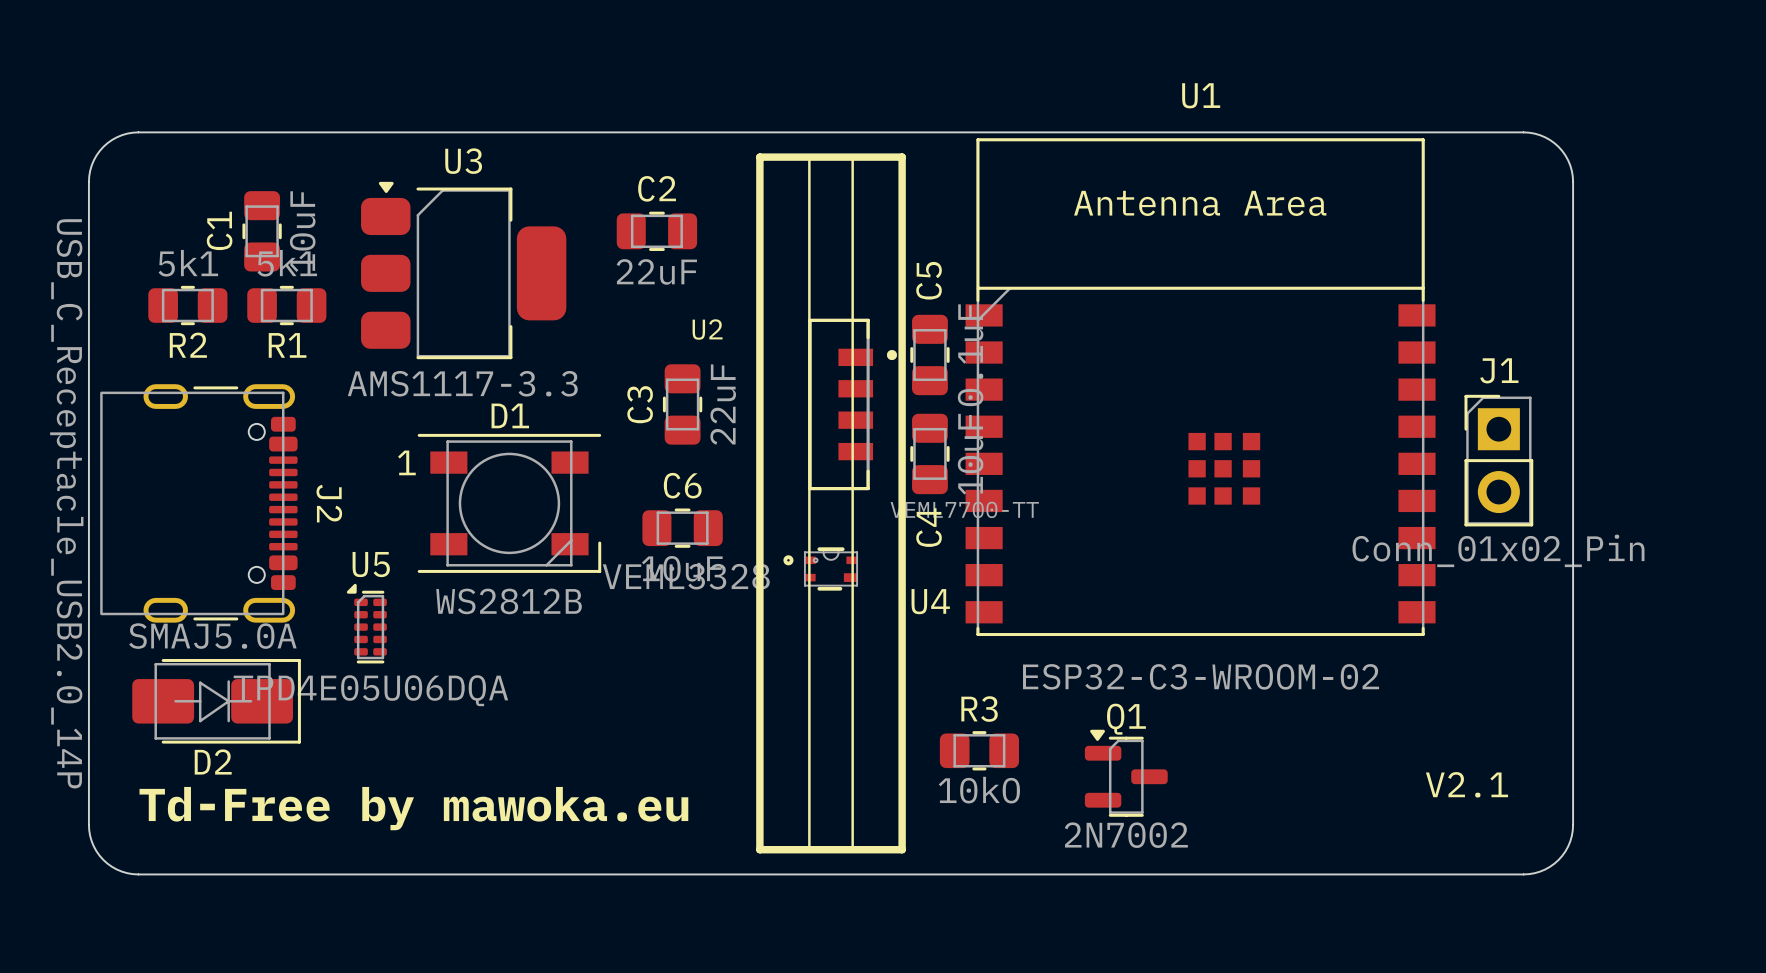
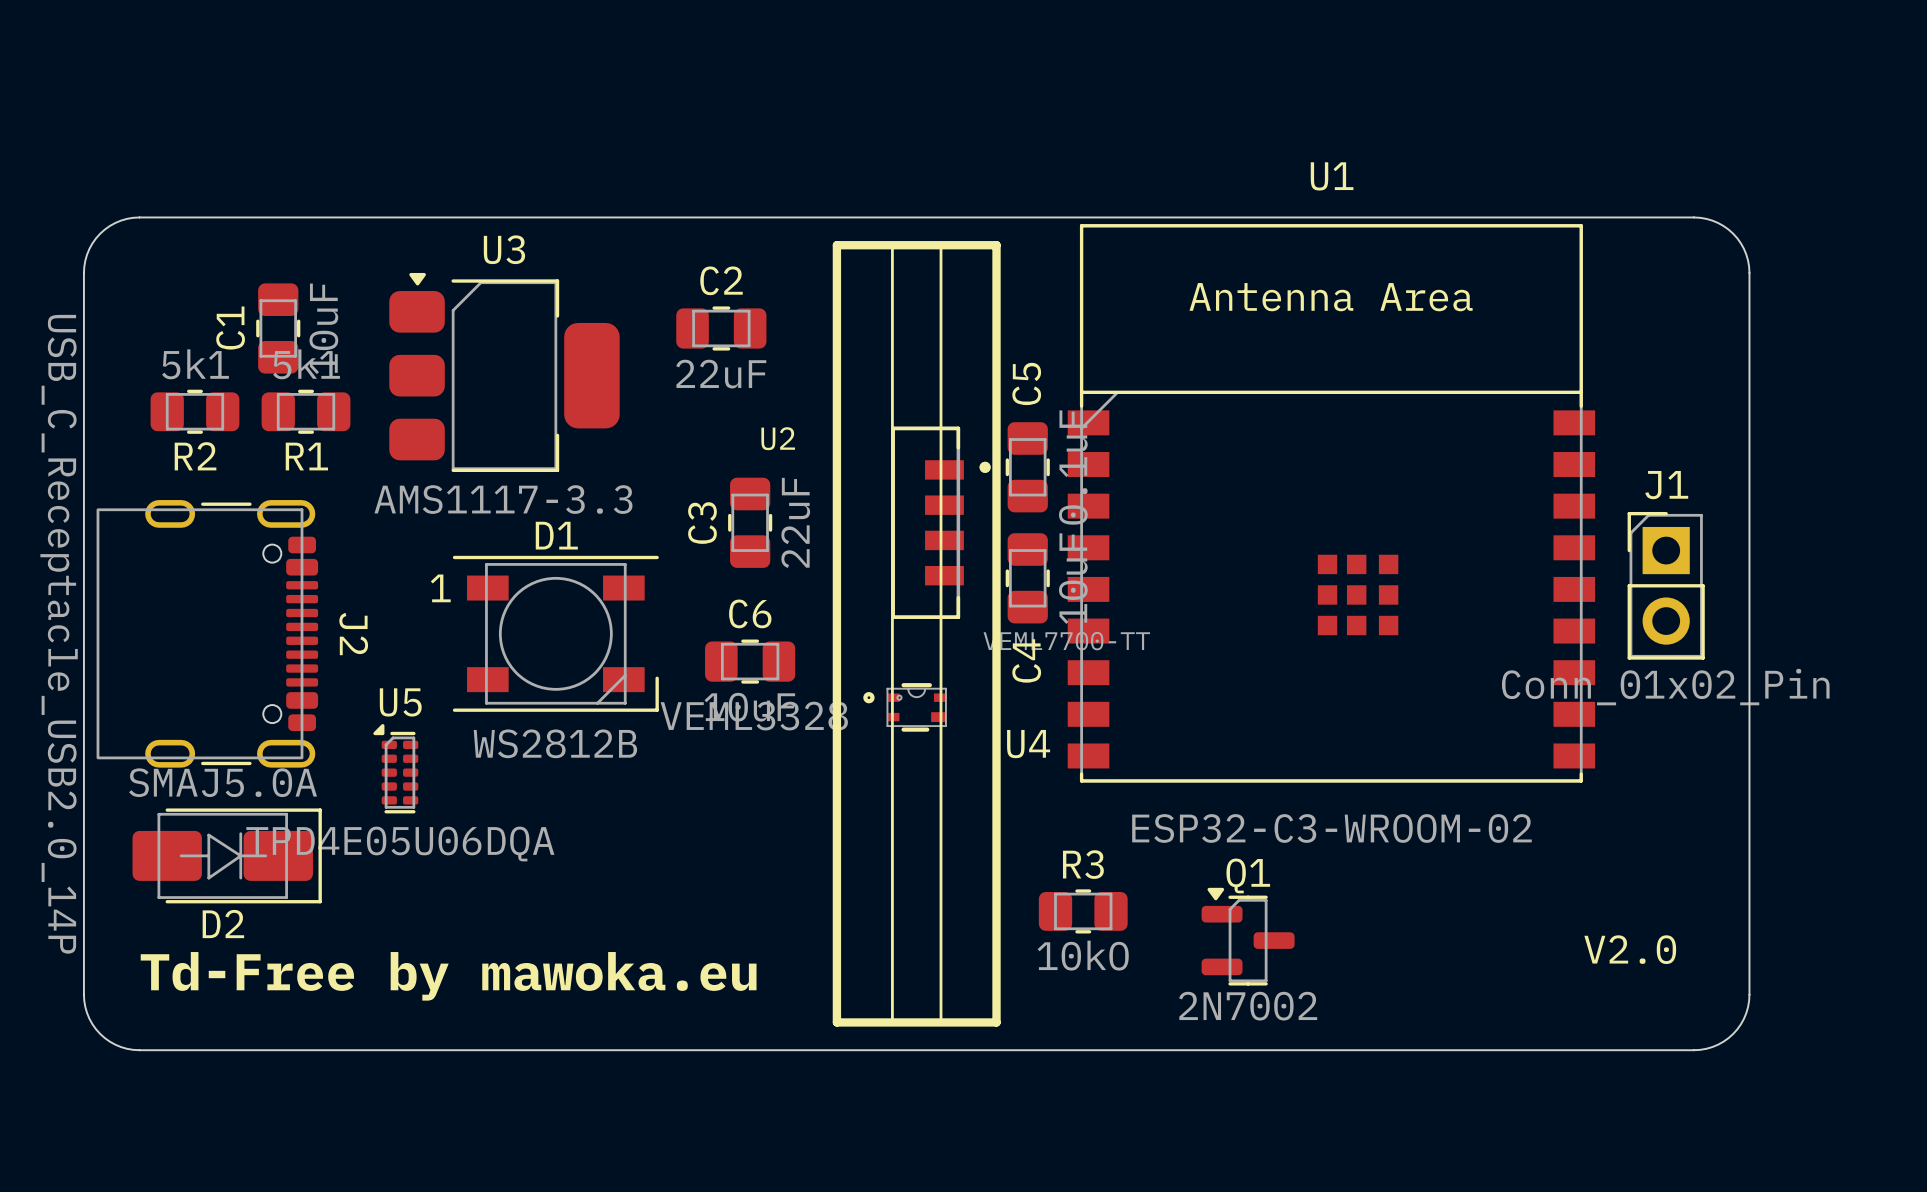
text: V2.1 (1467, 784) -> V2.0 (1630, 949)

